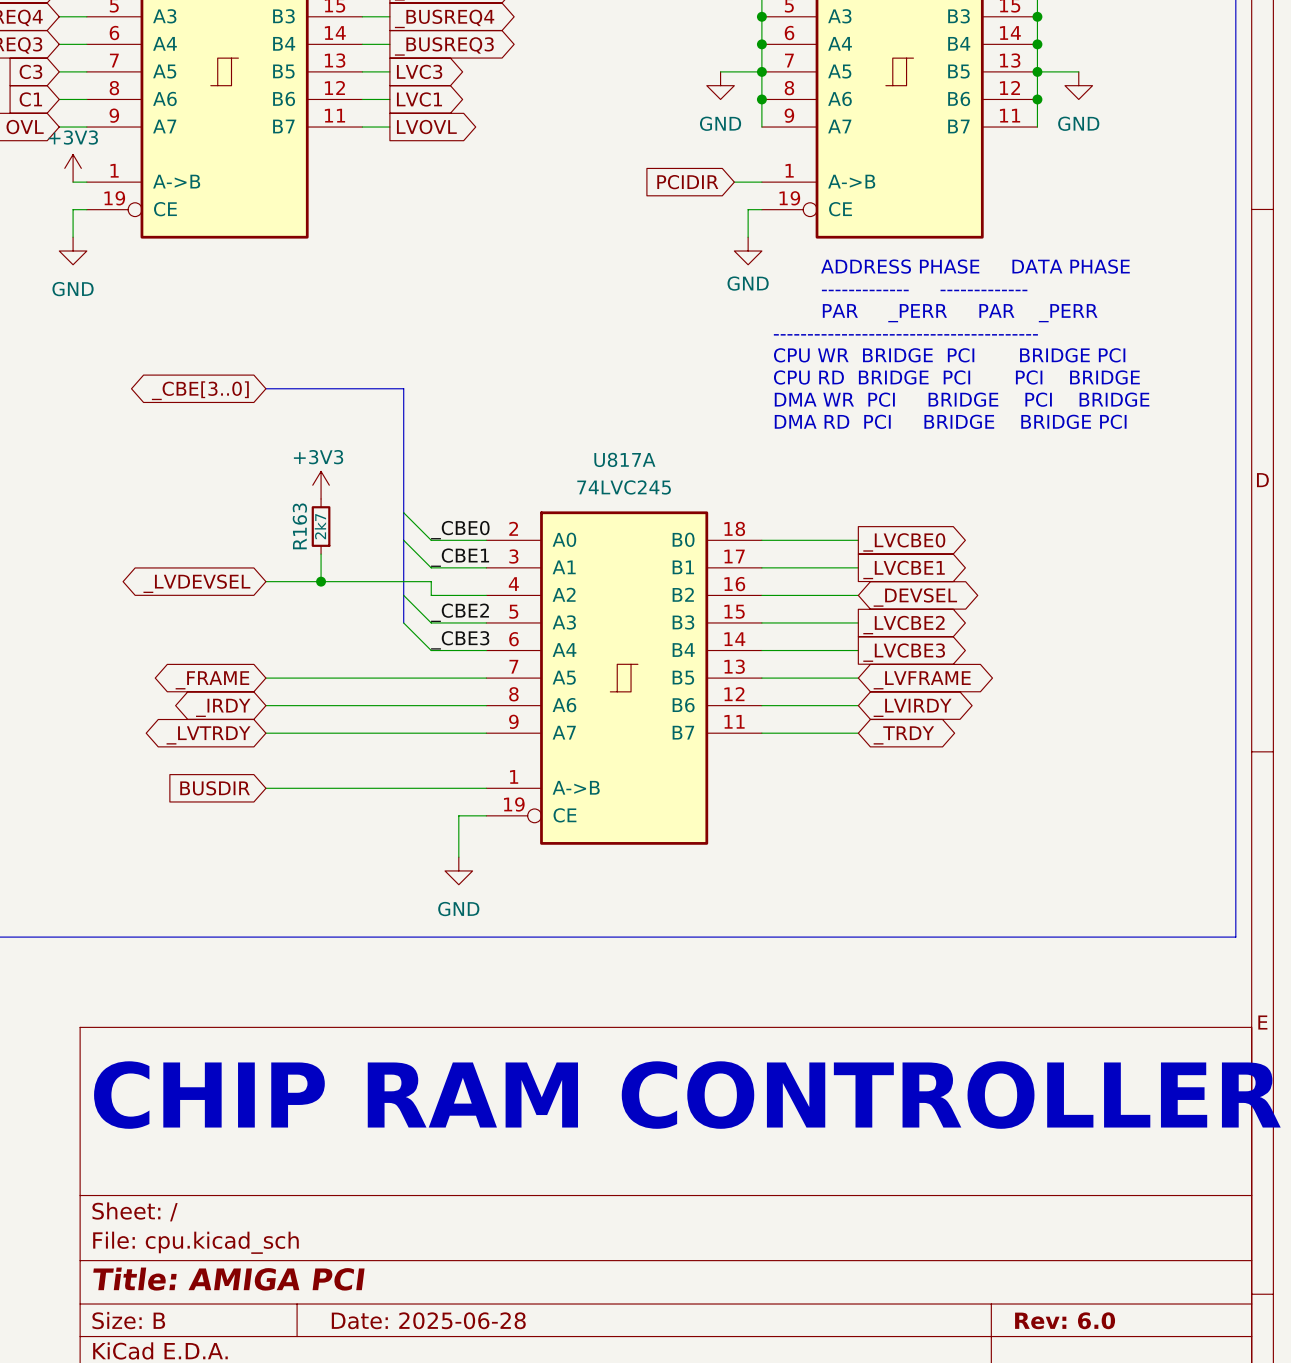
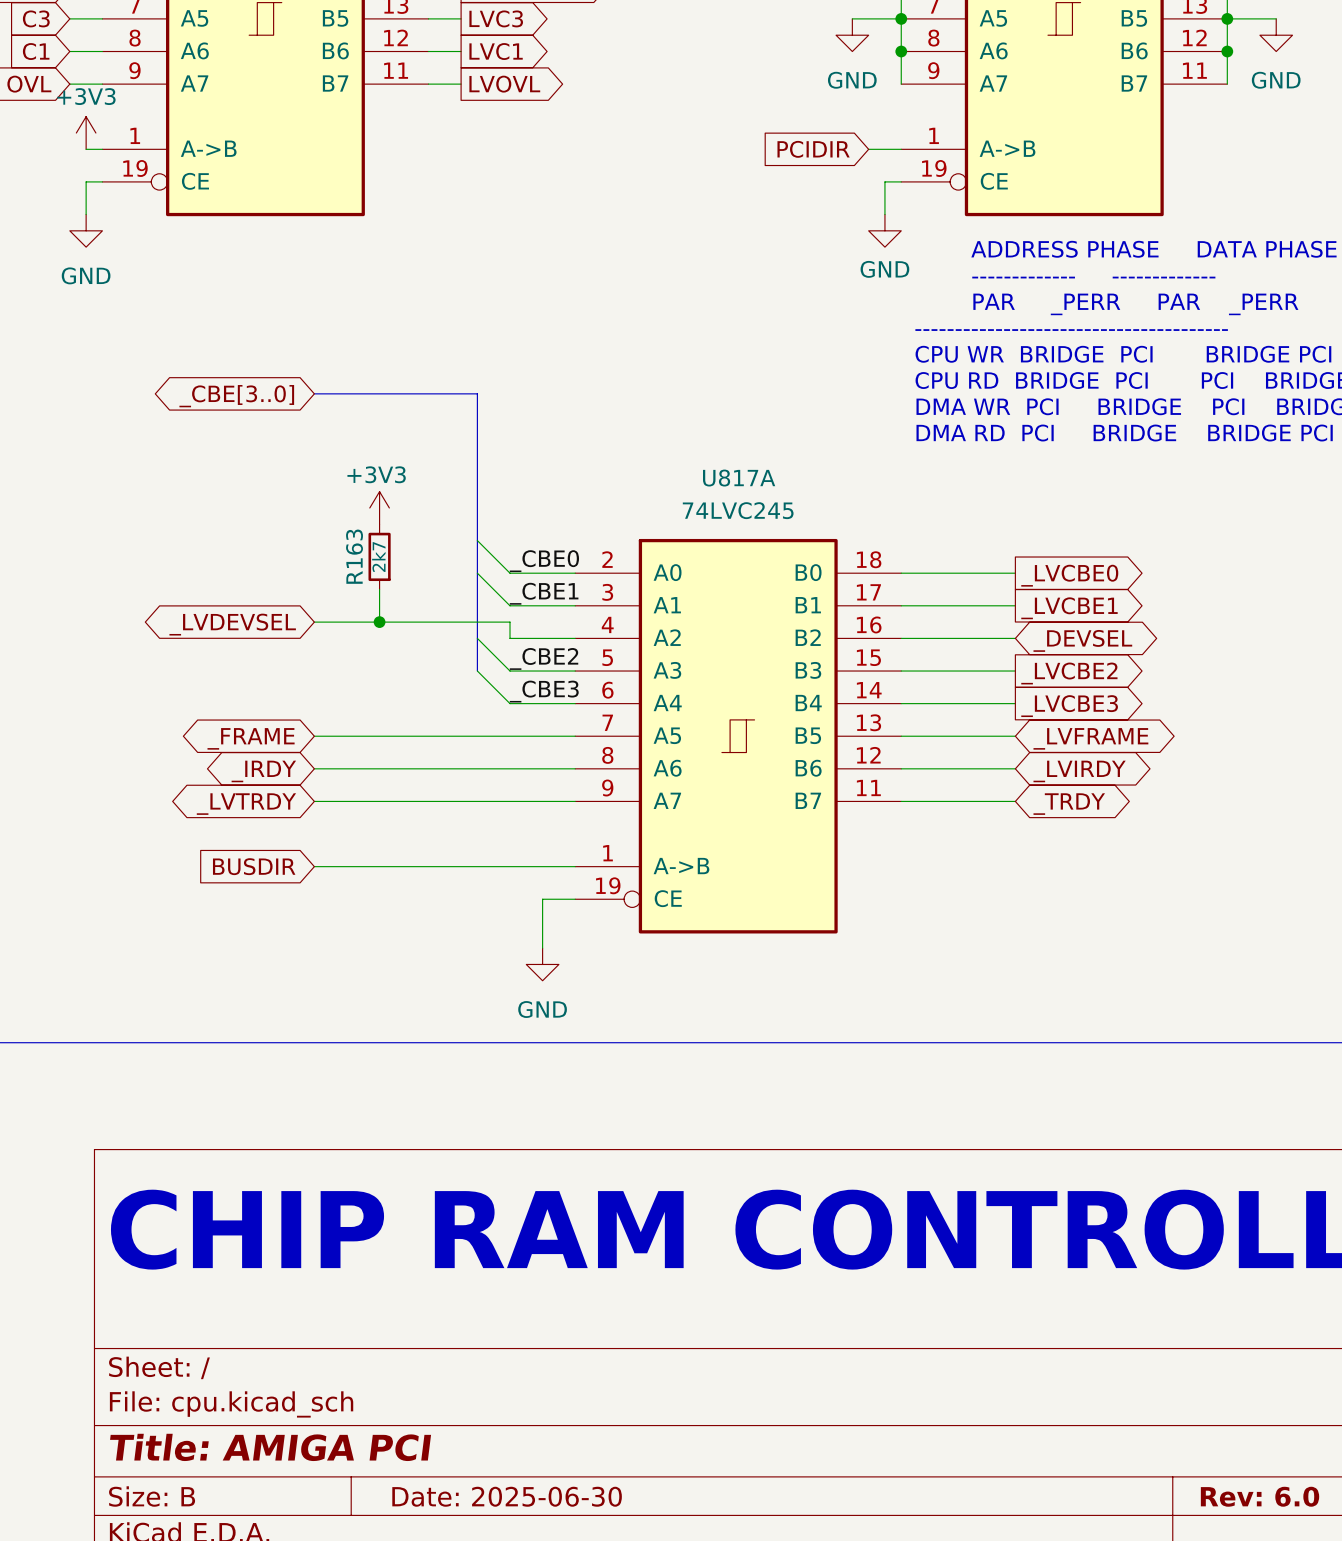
title block: Date: 2025-06-28 (428, 1320) -> Date: 2025-06-30 (507, 1496)

